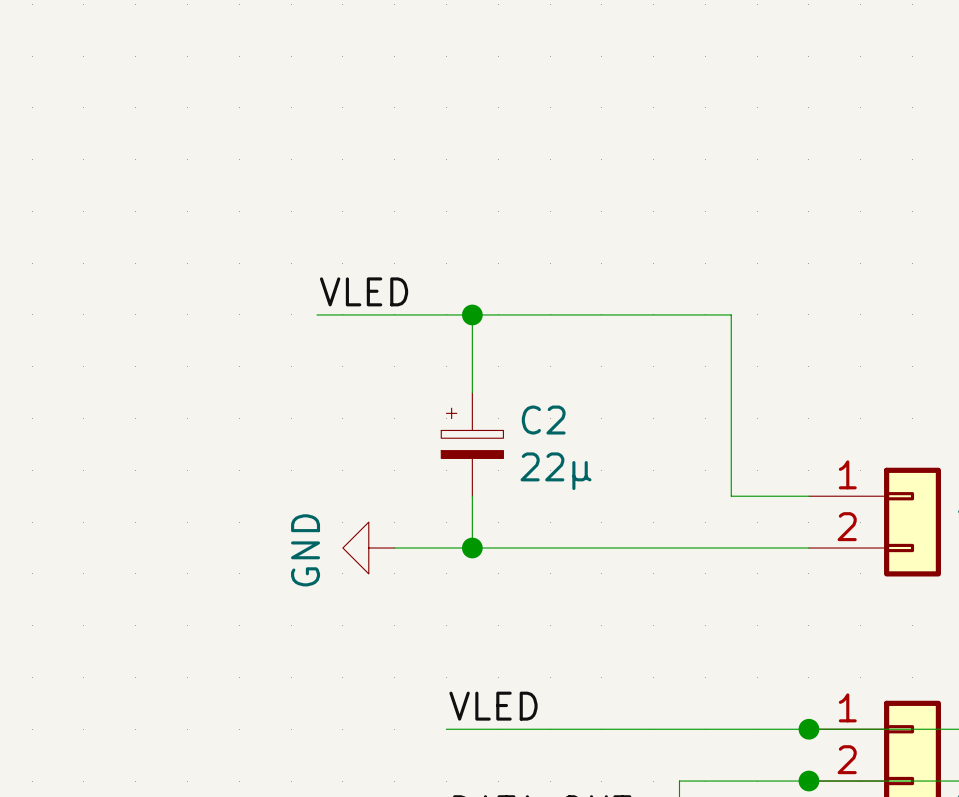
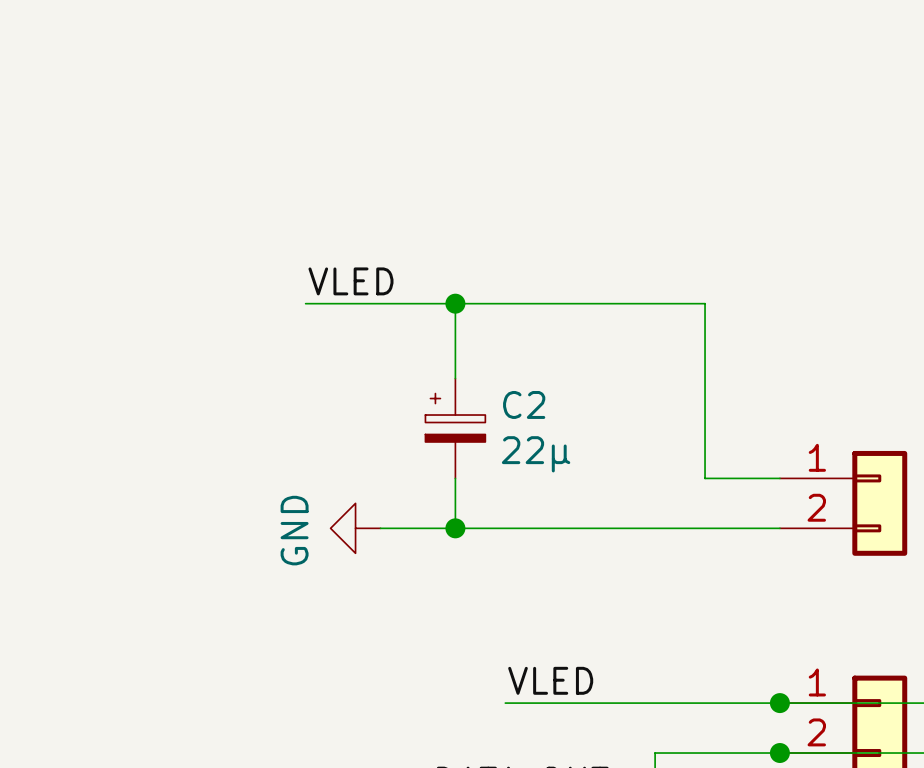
label position: VLED (493, 706) -> VLED (550, 680)
wire: (446, 729) (524, 729) -> none

